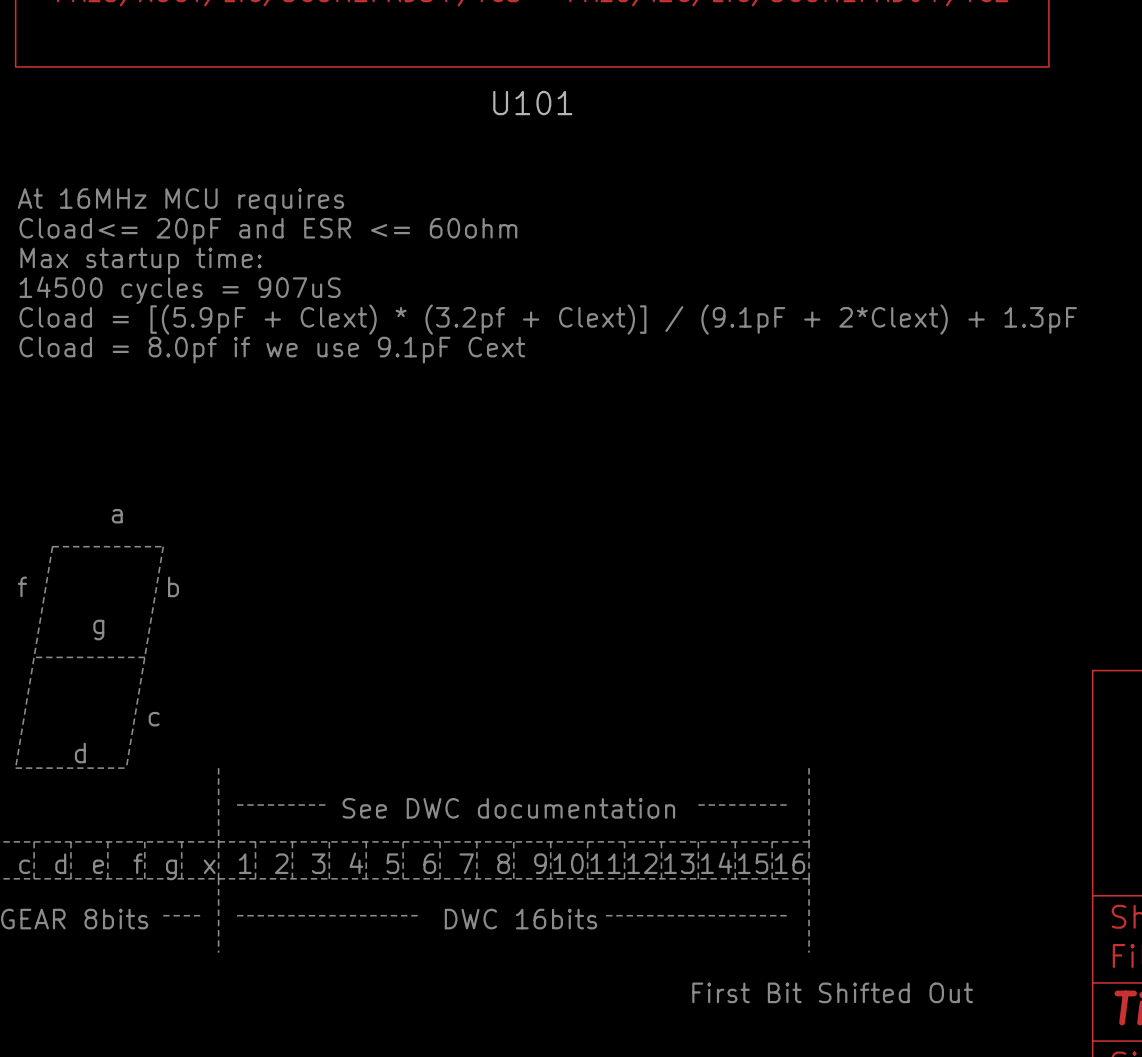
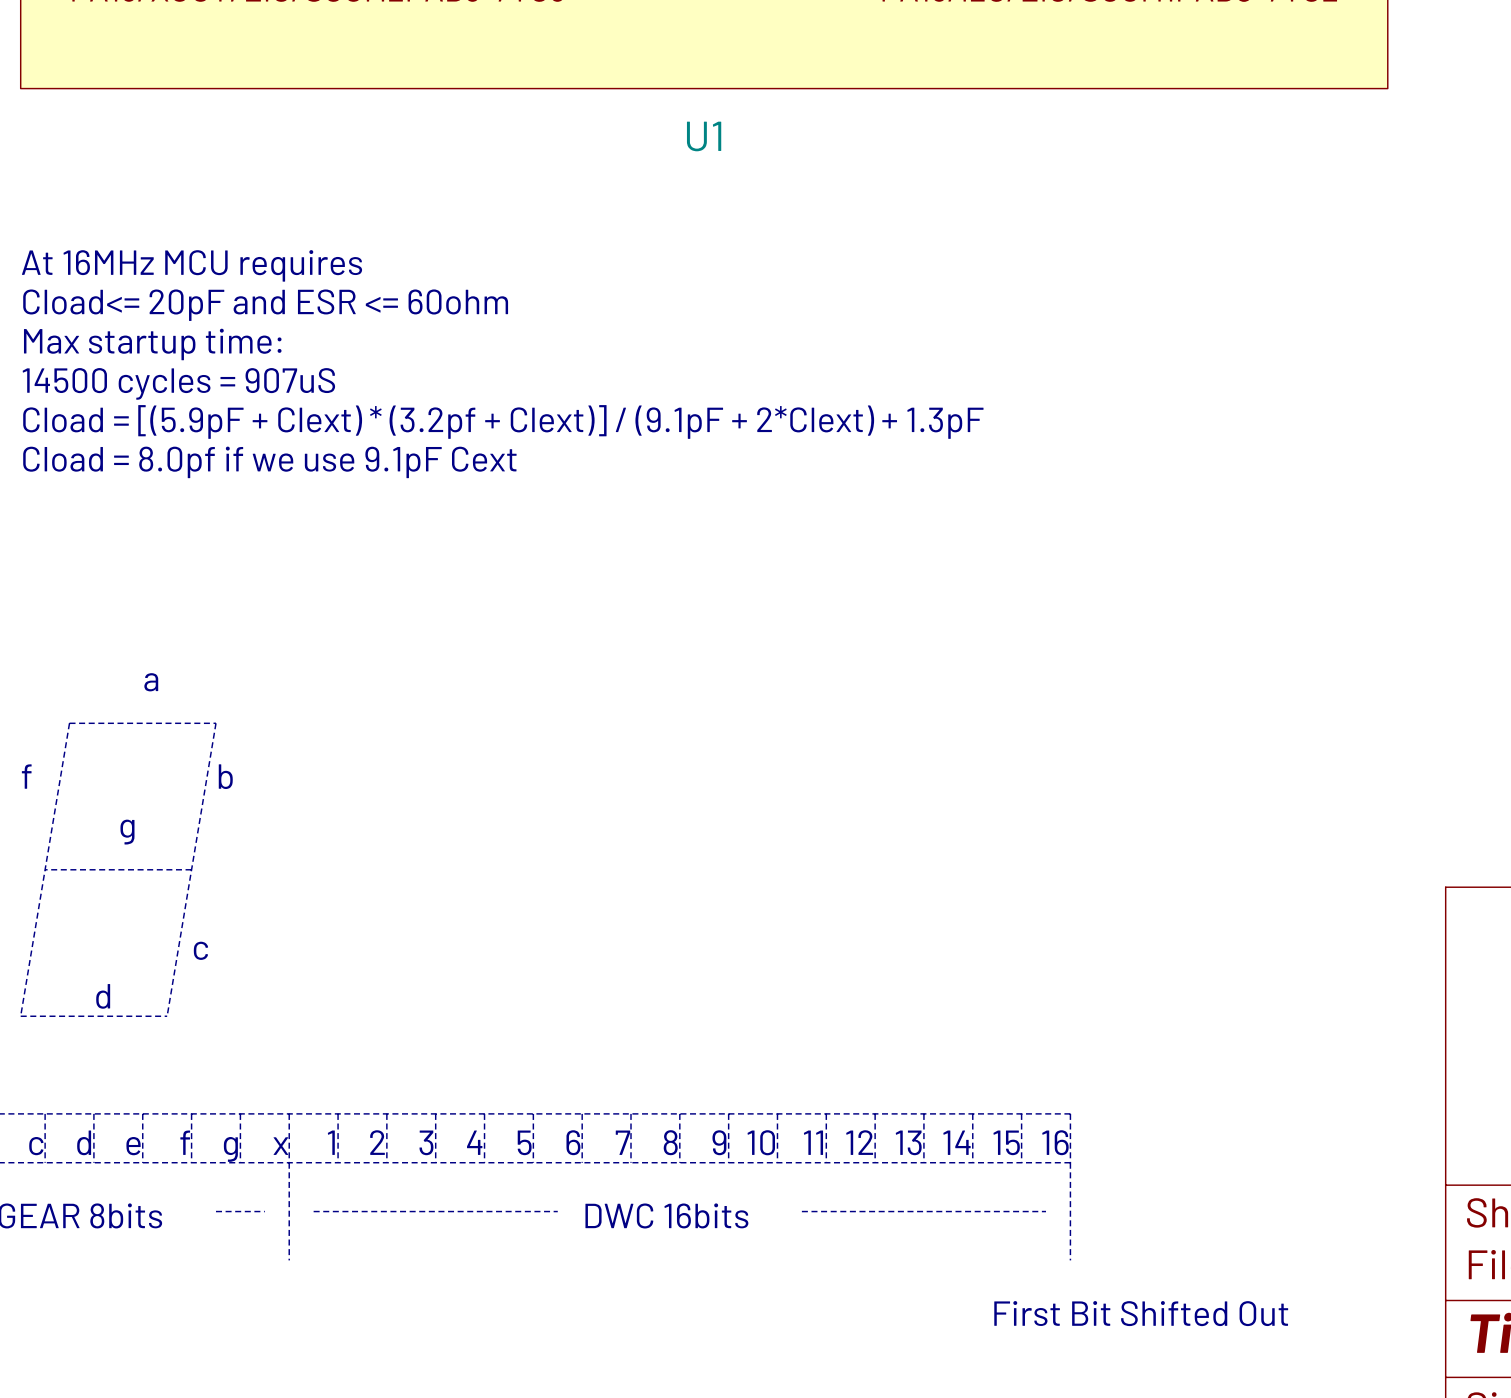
U101 name: U101 (532, 103) -> U1 (704, 136)
line: (218, 768) (218, 841) -> none
line: (809, 768) (809, 841) -> none
line: (237, 805) (329, 805) -> none
line: (698, 805) (790, 805) -> none
text: See DWC documentation (508, 808) -> none

